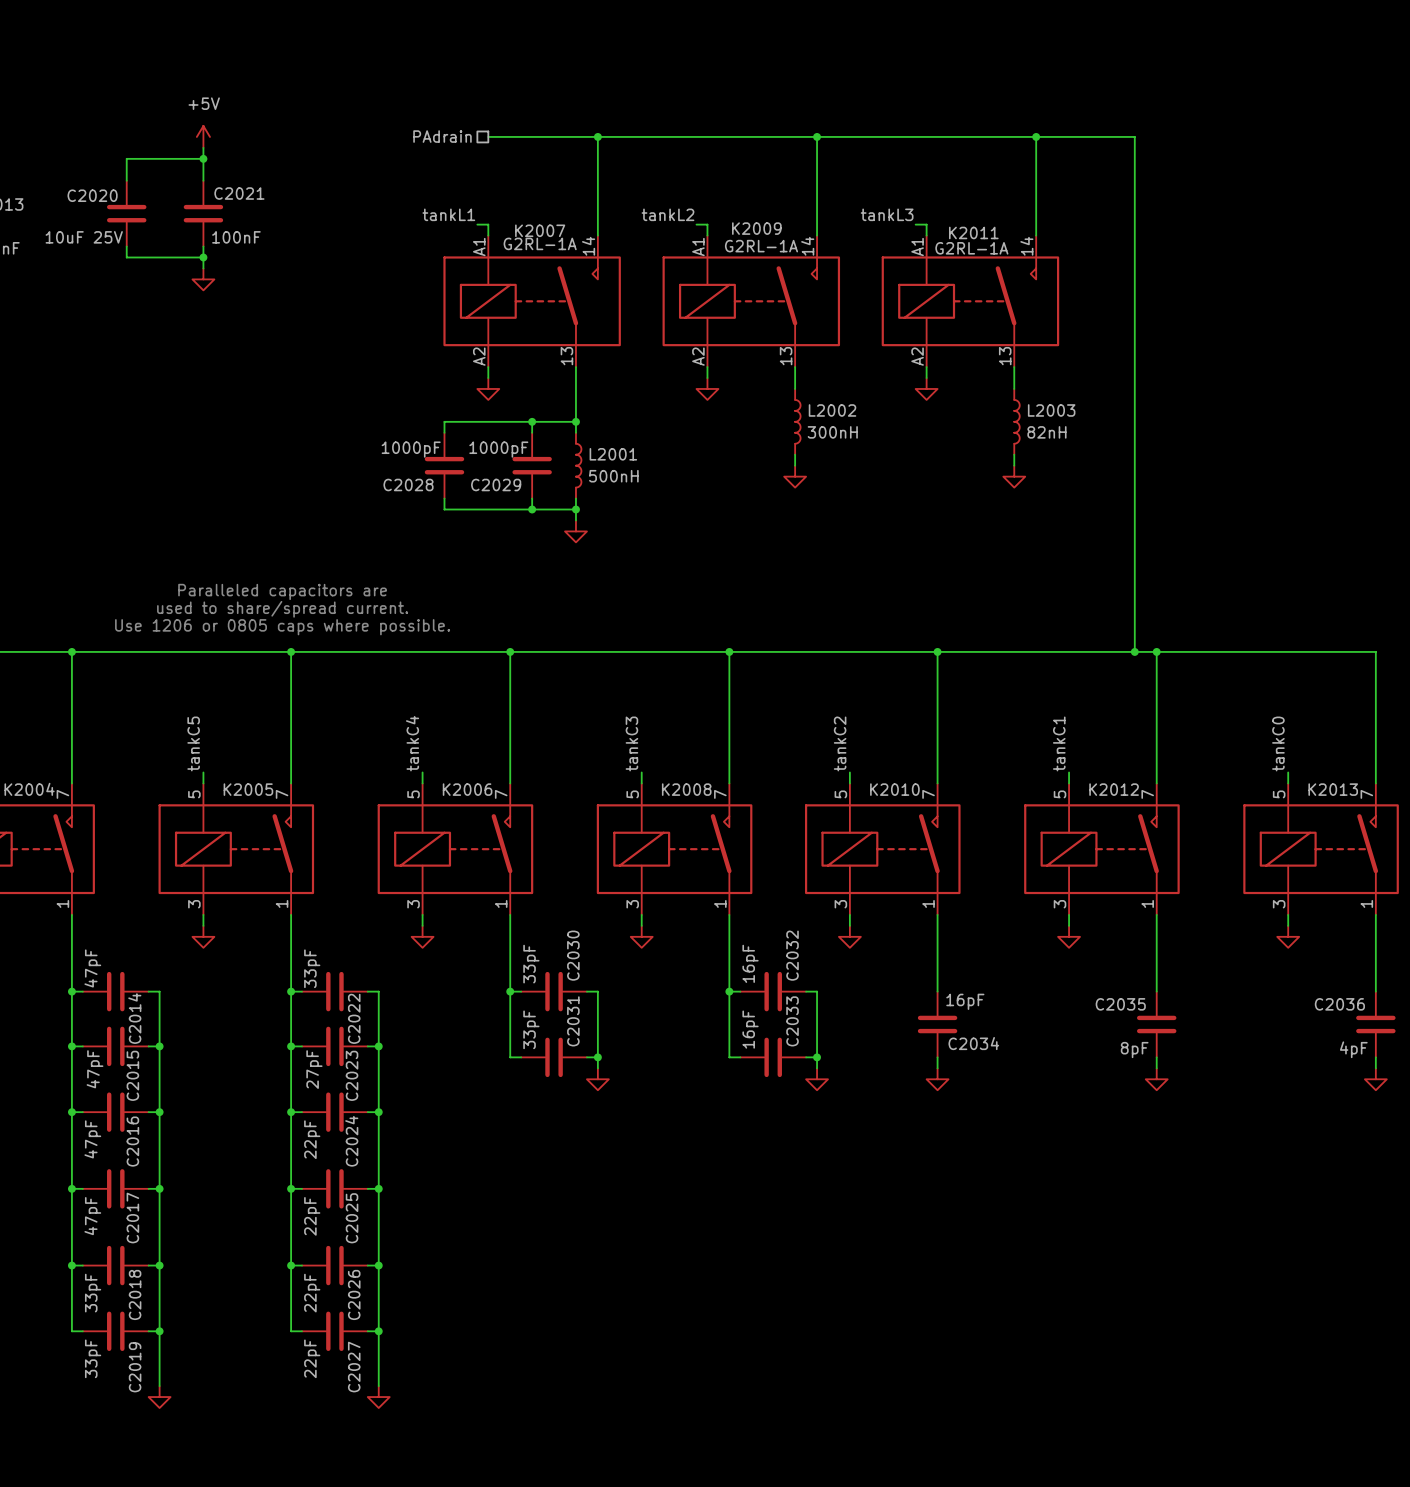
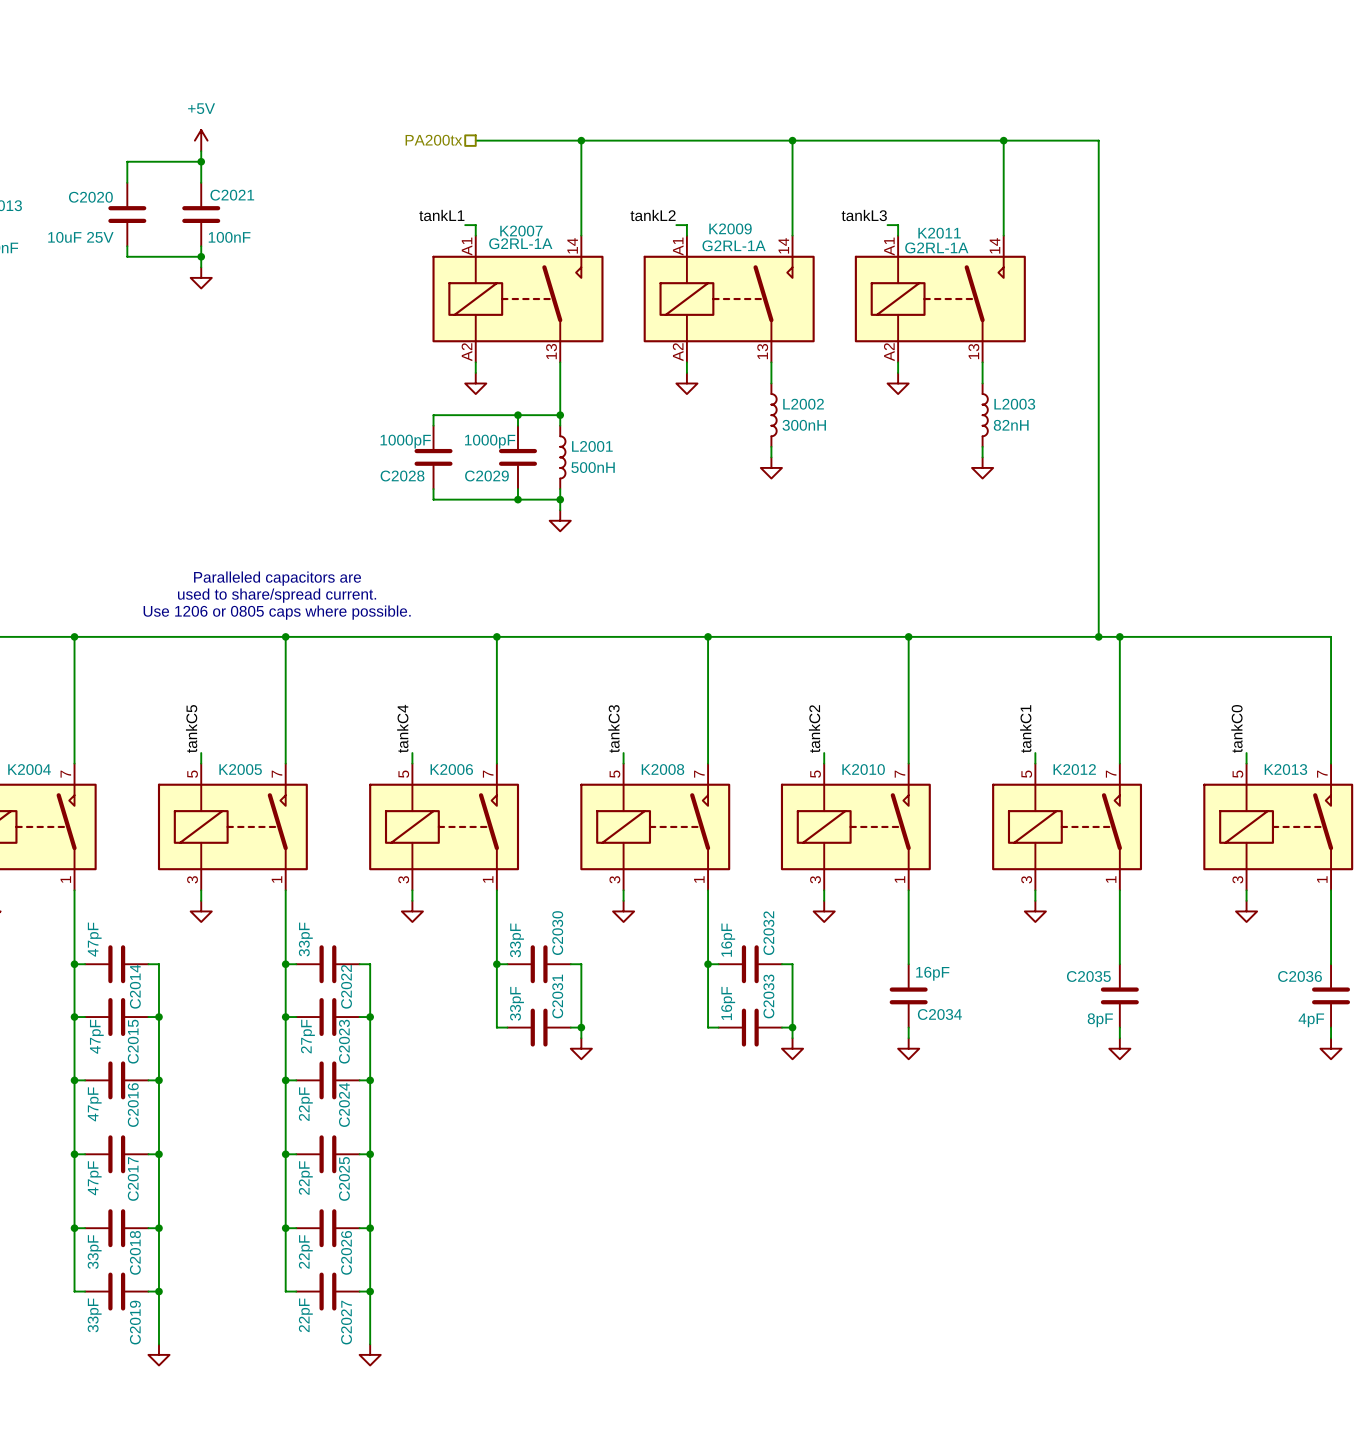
hierarchical label: PAdrain (442, 136) -> PA200tx (433, 140)

